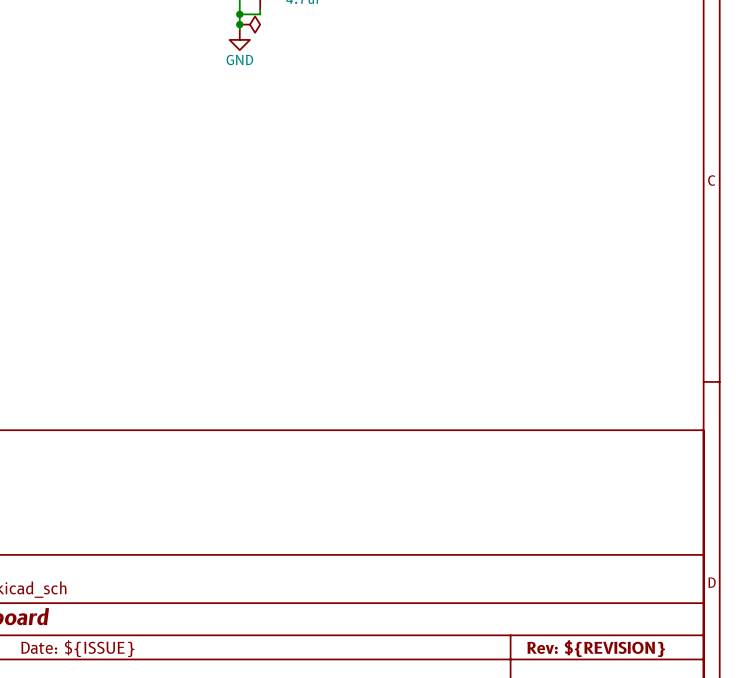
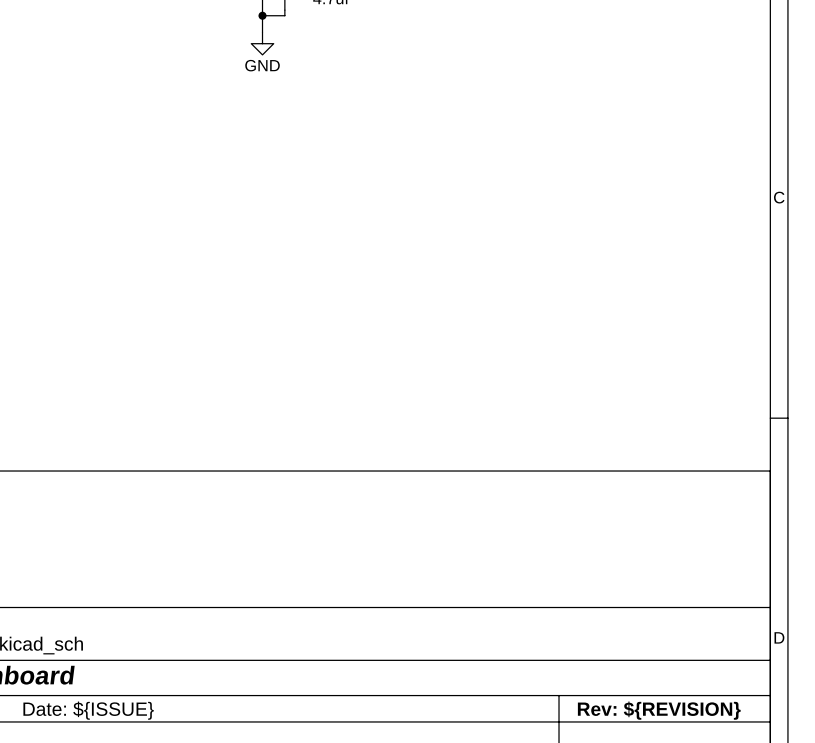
junction: (239, 24) -> none
power symbol: (249, 24) -> none

